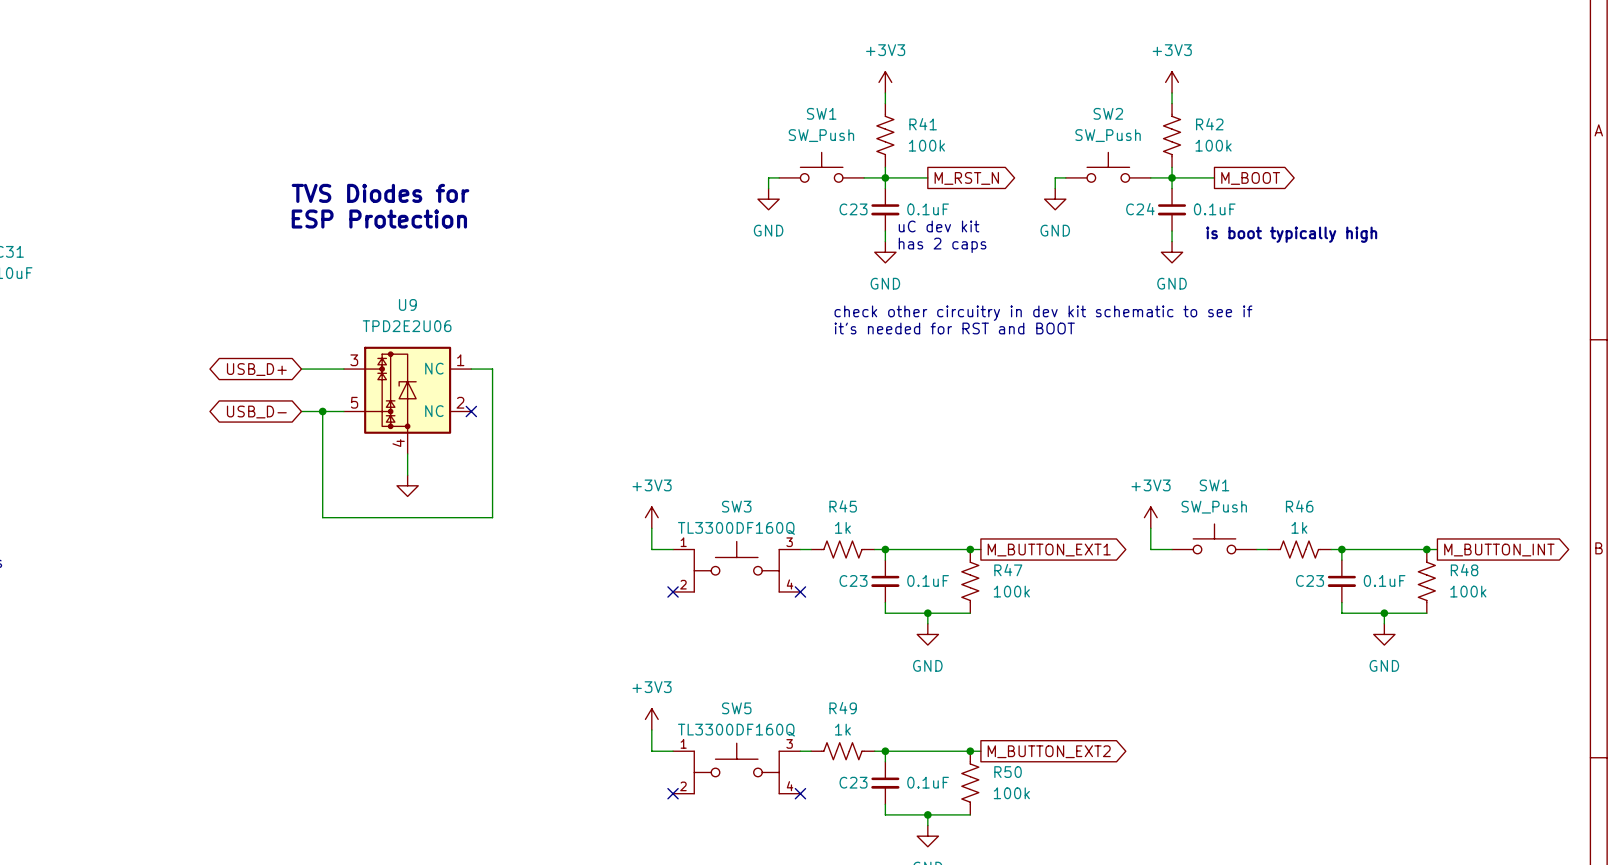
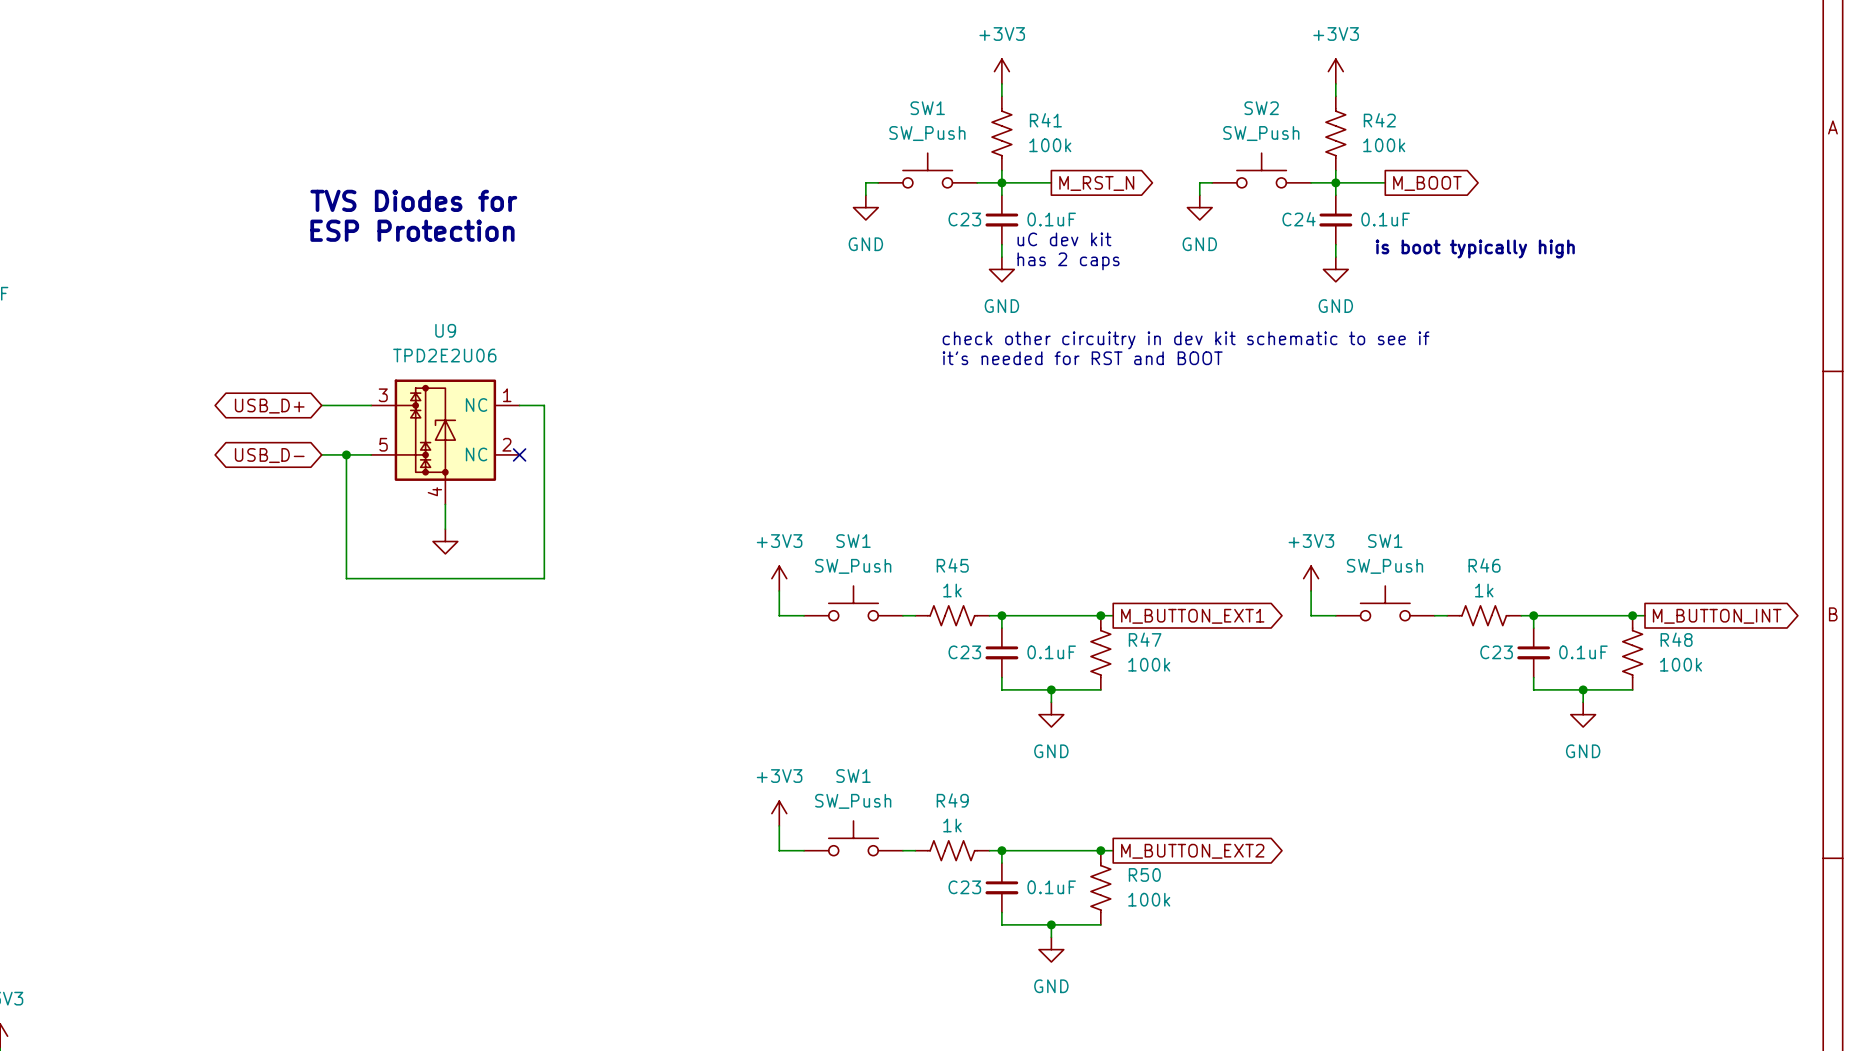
power symbol position: +3V3 (651, 517) -> +3V3 (779, 578)
wire: (651, 528) (651, 549) (673, 549) -> (779, 590) (779, 615) (804, 615)
SW1: none -> SW_Push (853, 603)
SW3: TL3300DF160Q (736, 566) -> none
no-connect mark: (673, 591) -> none
no-connect mark: (800, 591) -> none
power symbol position: +3V3 (651, 719) -> +3V3 (779, 813)
wire: (651, 730) (651, 751) (673, 751) -> (779, 825) (779, 850) (804, 850)
SW1: none -> SW_Push (853, 838)
SW5: TL3300DF160Q (736, 768) -> none
no-connect mark: (673, 793) -> none
no-connect mark: (800, 793) -> none

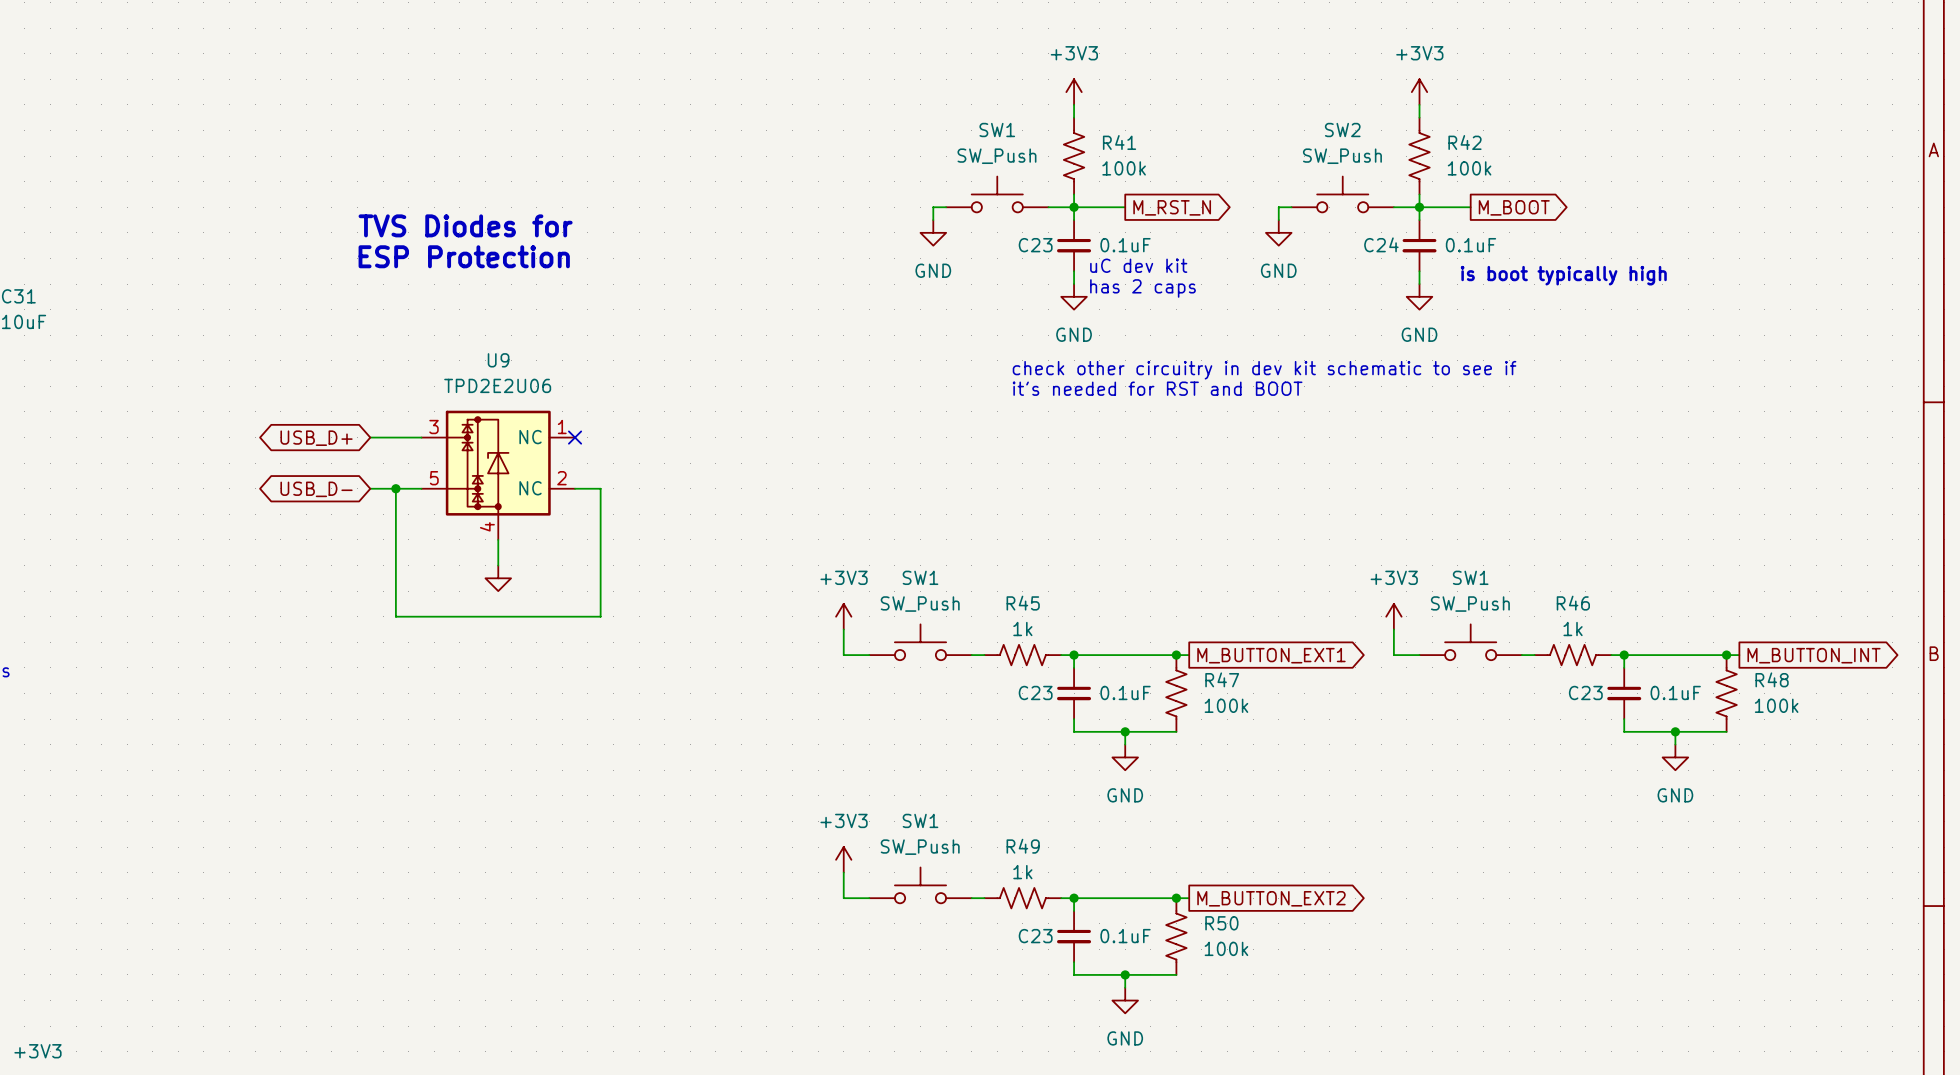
wire: (519, 405) (544, 405) (544, 454) -> (575, 488) (600, 488)
no-connect mark position: (519, 454) -> (575, 437)

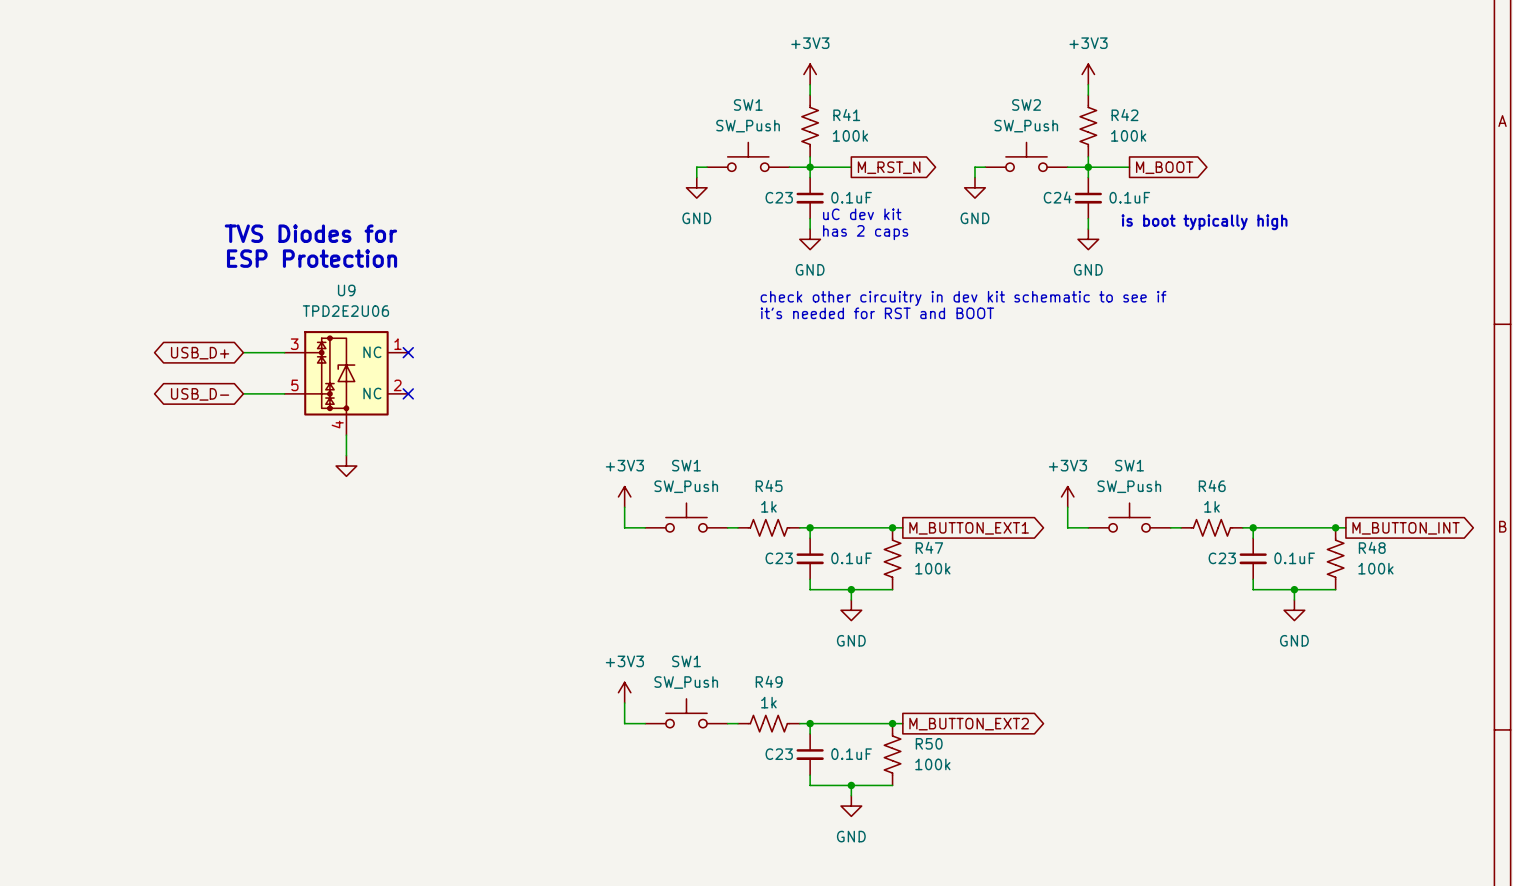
text position: TVS Diodes for (465, 225) -> TVS Diodes for (310, 233)
text position: ESP Protection (464, 256) -> ESP Protection (312, 258)
wire: (395, 488) (395, 616) (600, 616) (600, 488) (575, 488) -> none
junction: (395, 488) -> none
no-connect mark: none -> (408, 393)

